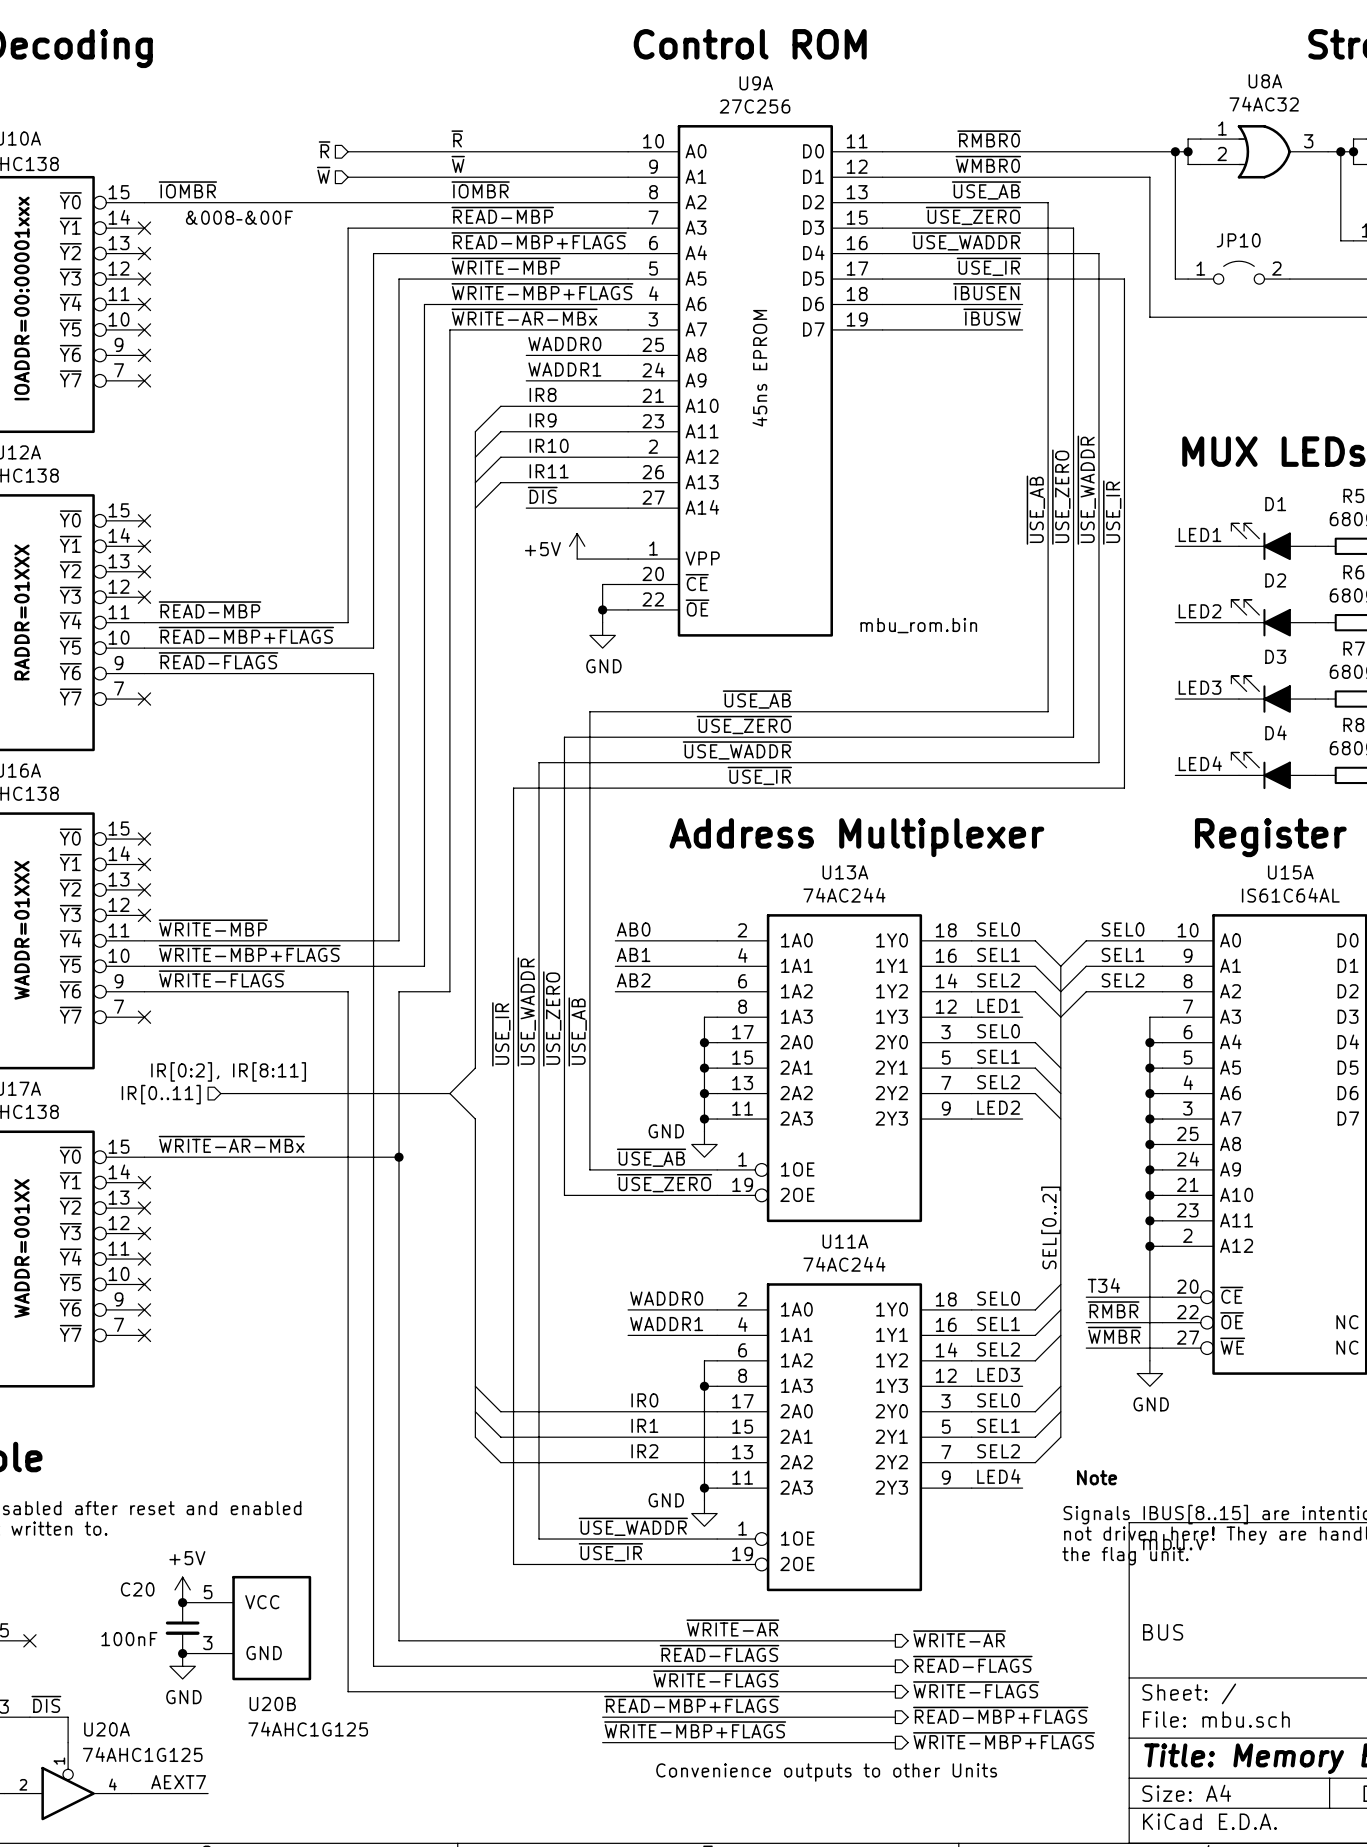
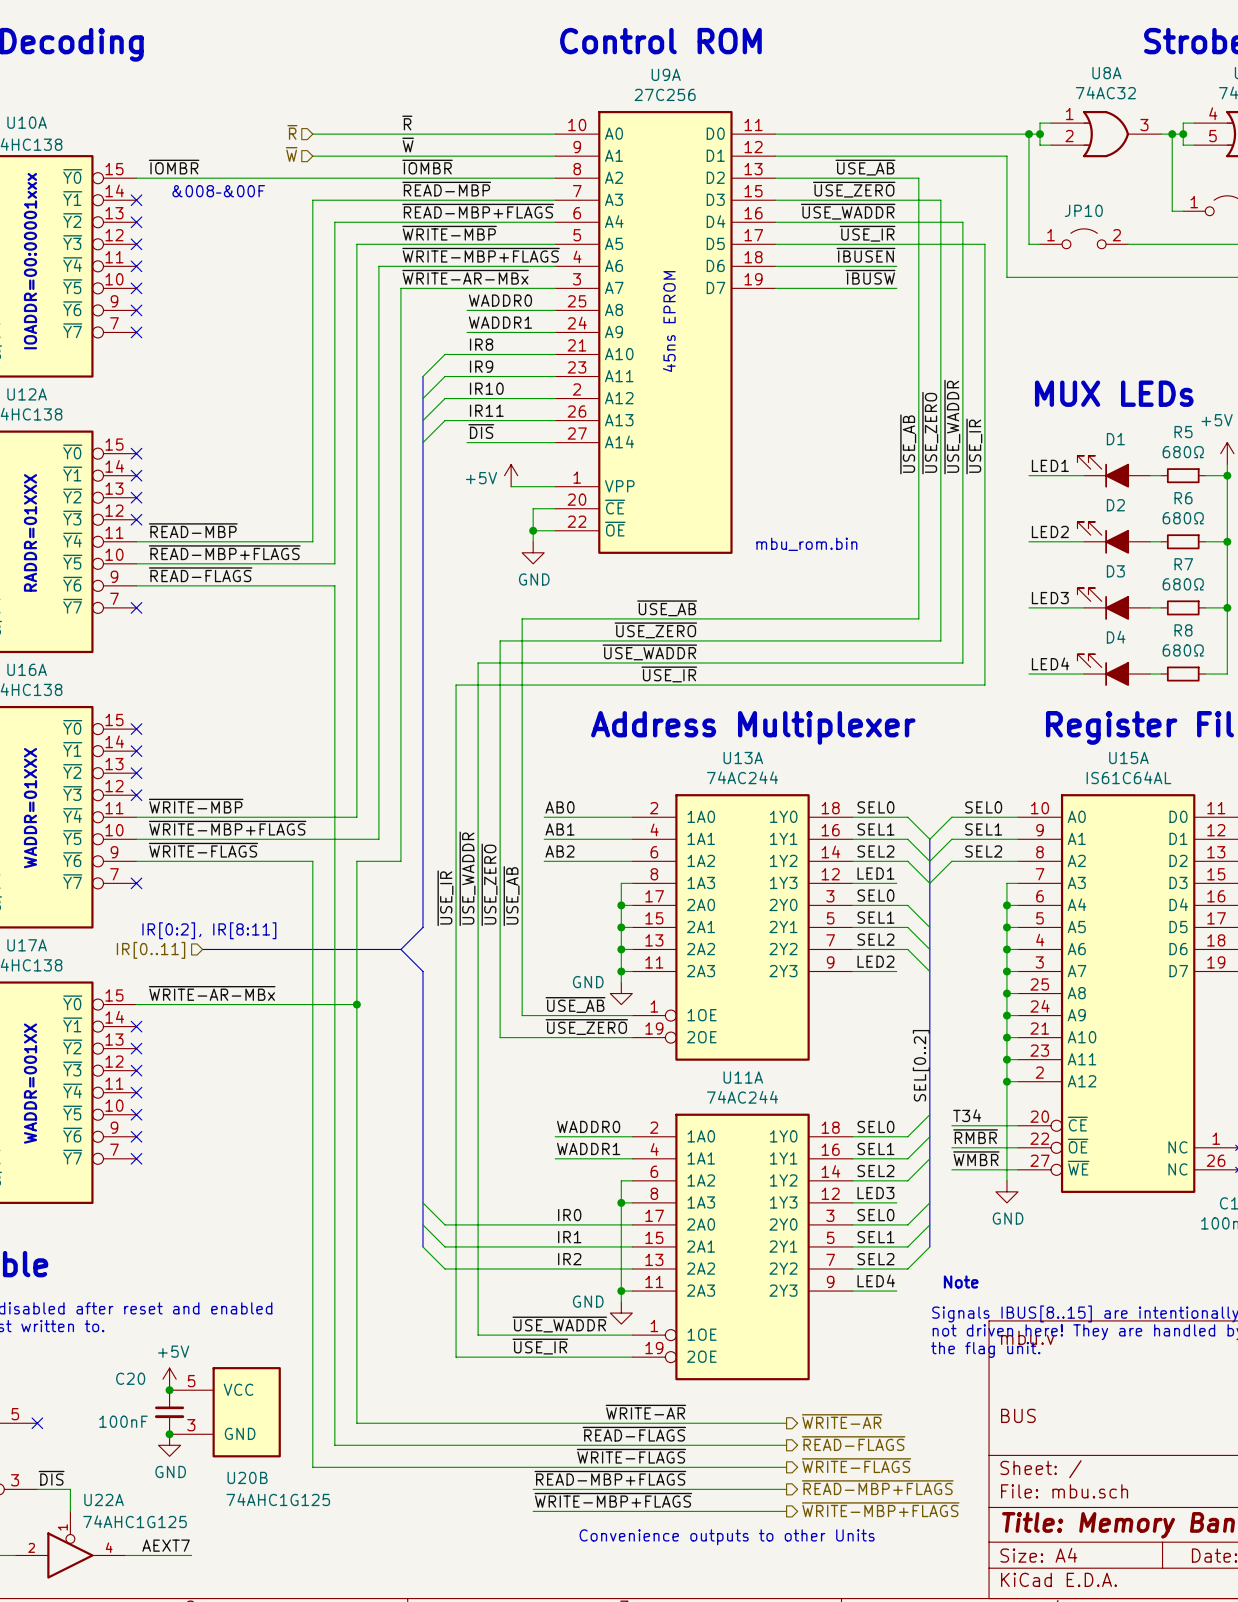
label: ~{RMBR0} (989, 138) -> none
label: ~{WMBR0} (988, 164) -> none
U20A name: U20A (106, 1729) -> U22A (104, 1499)

